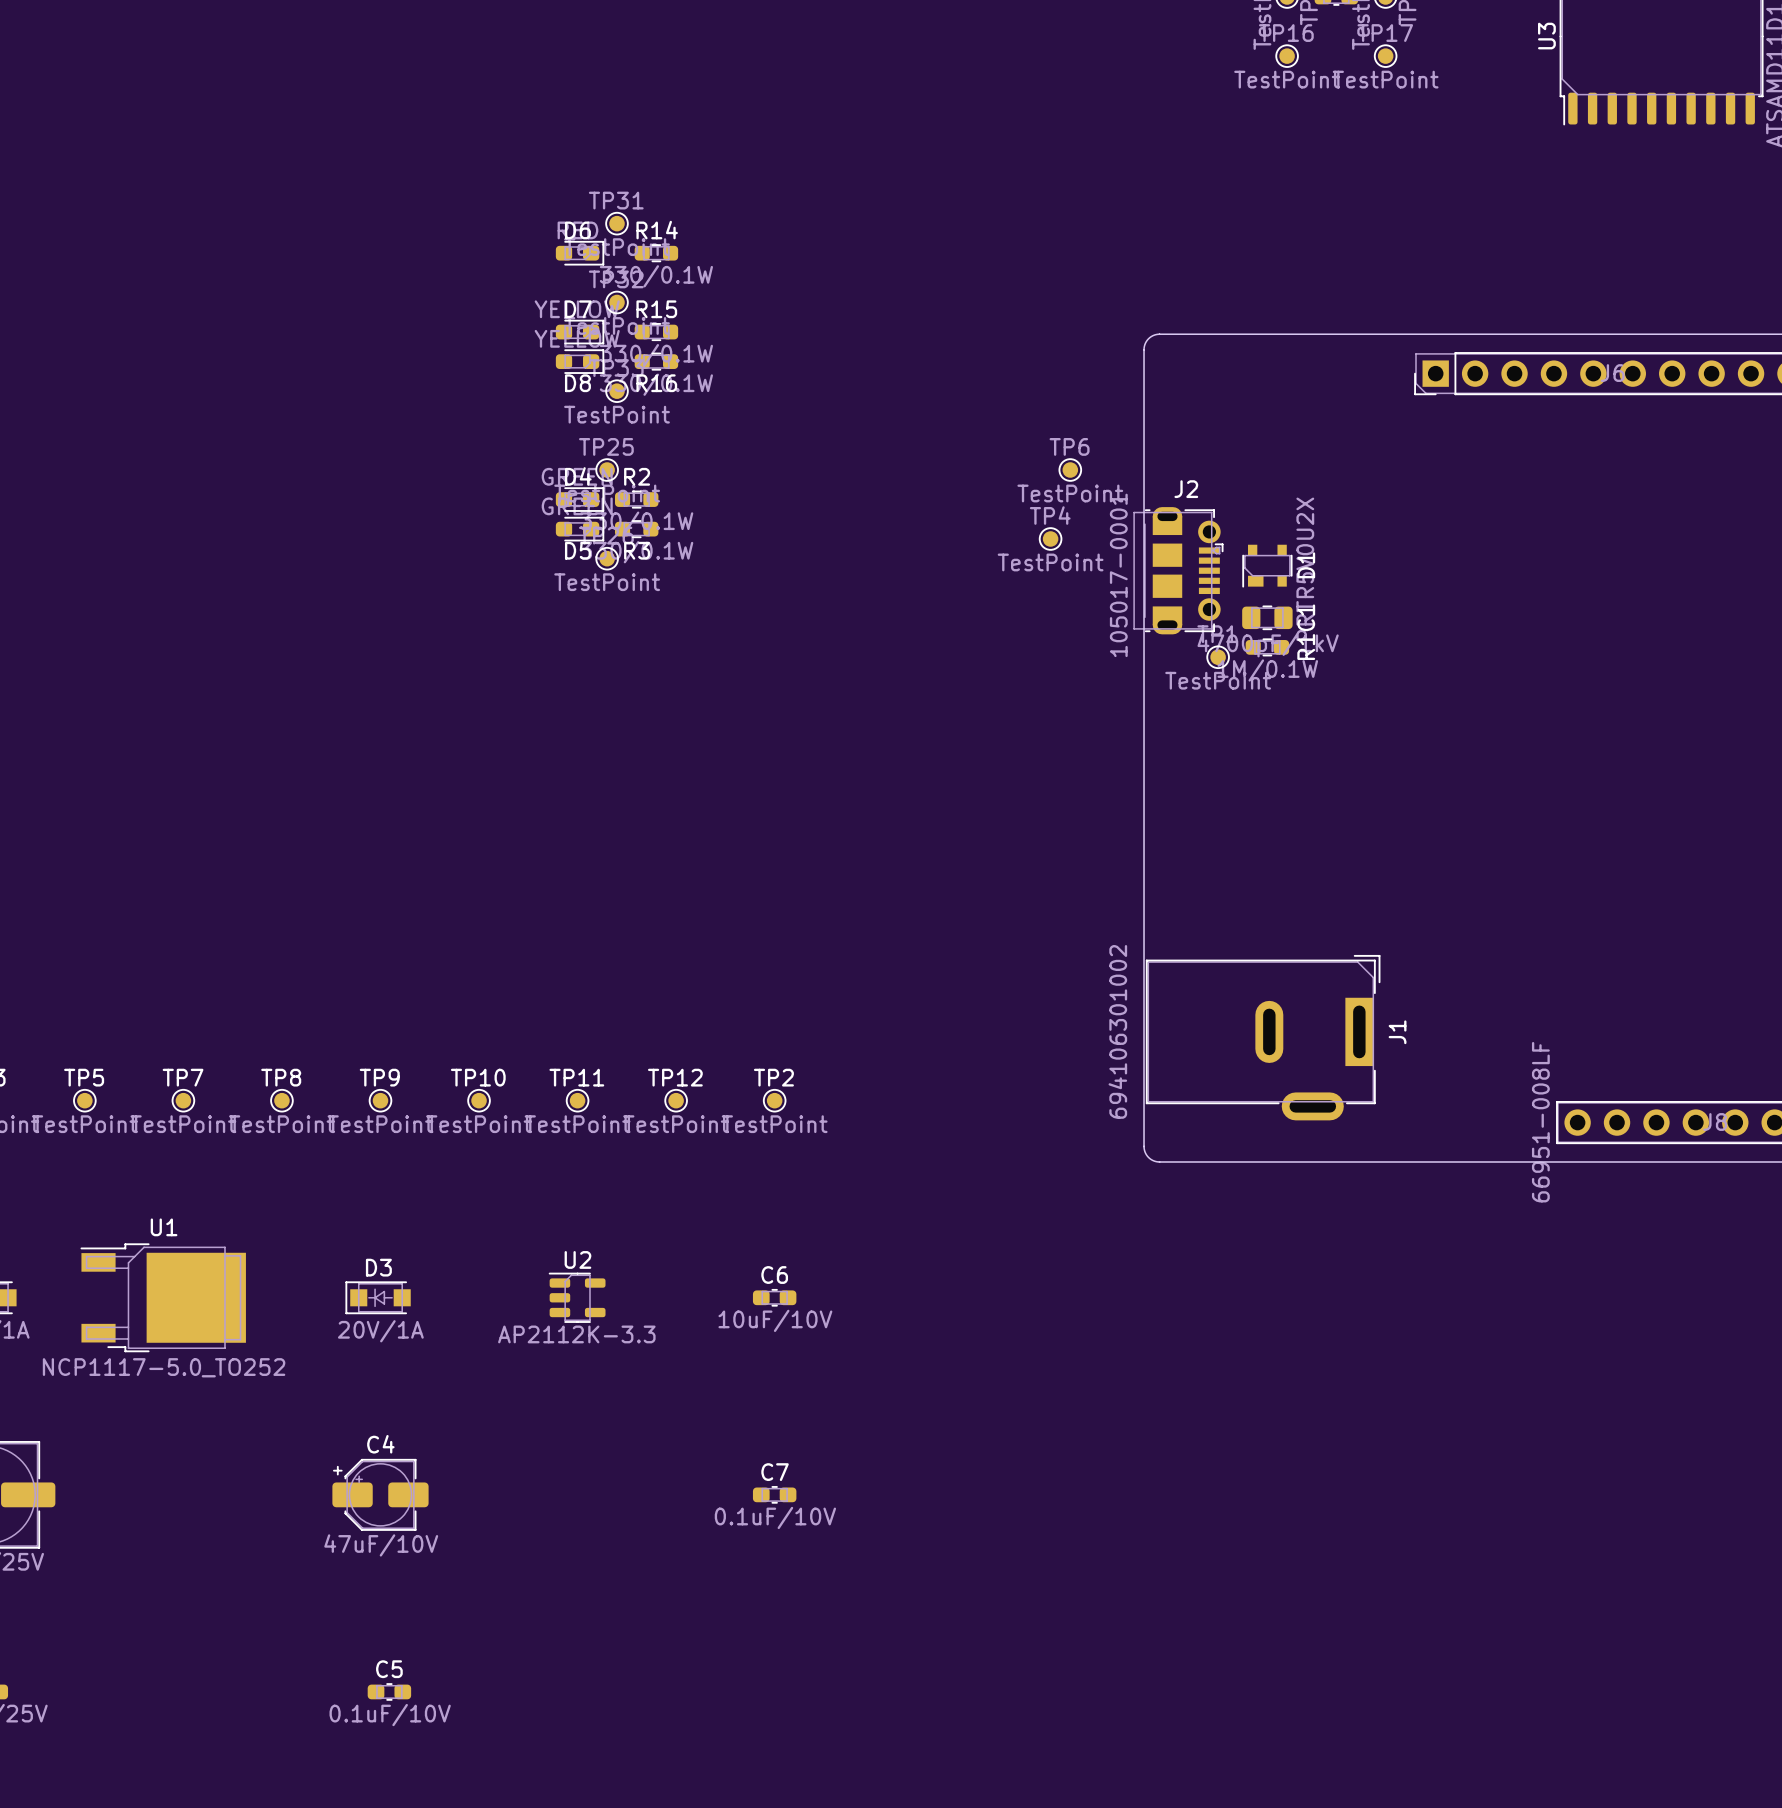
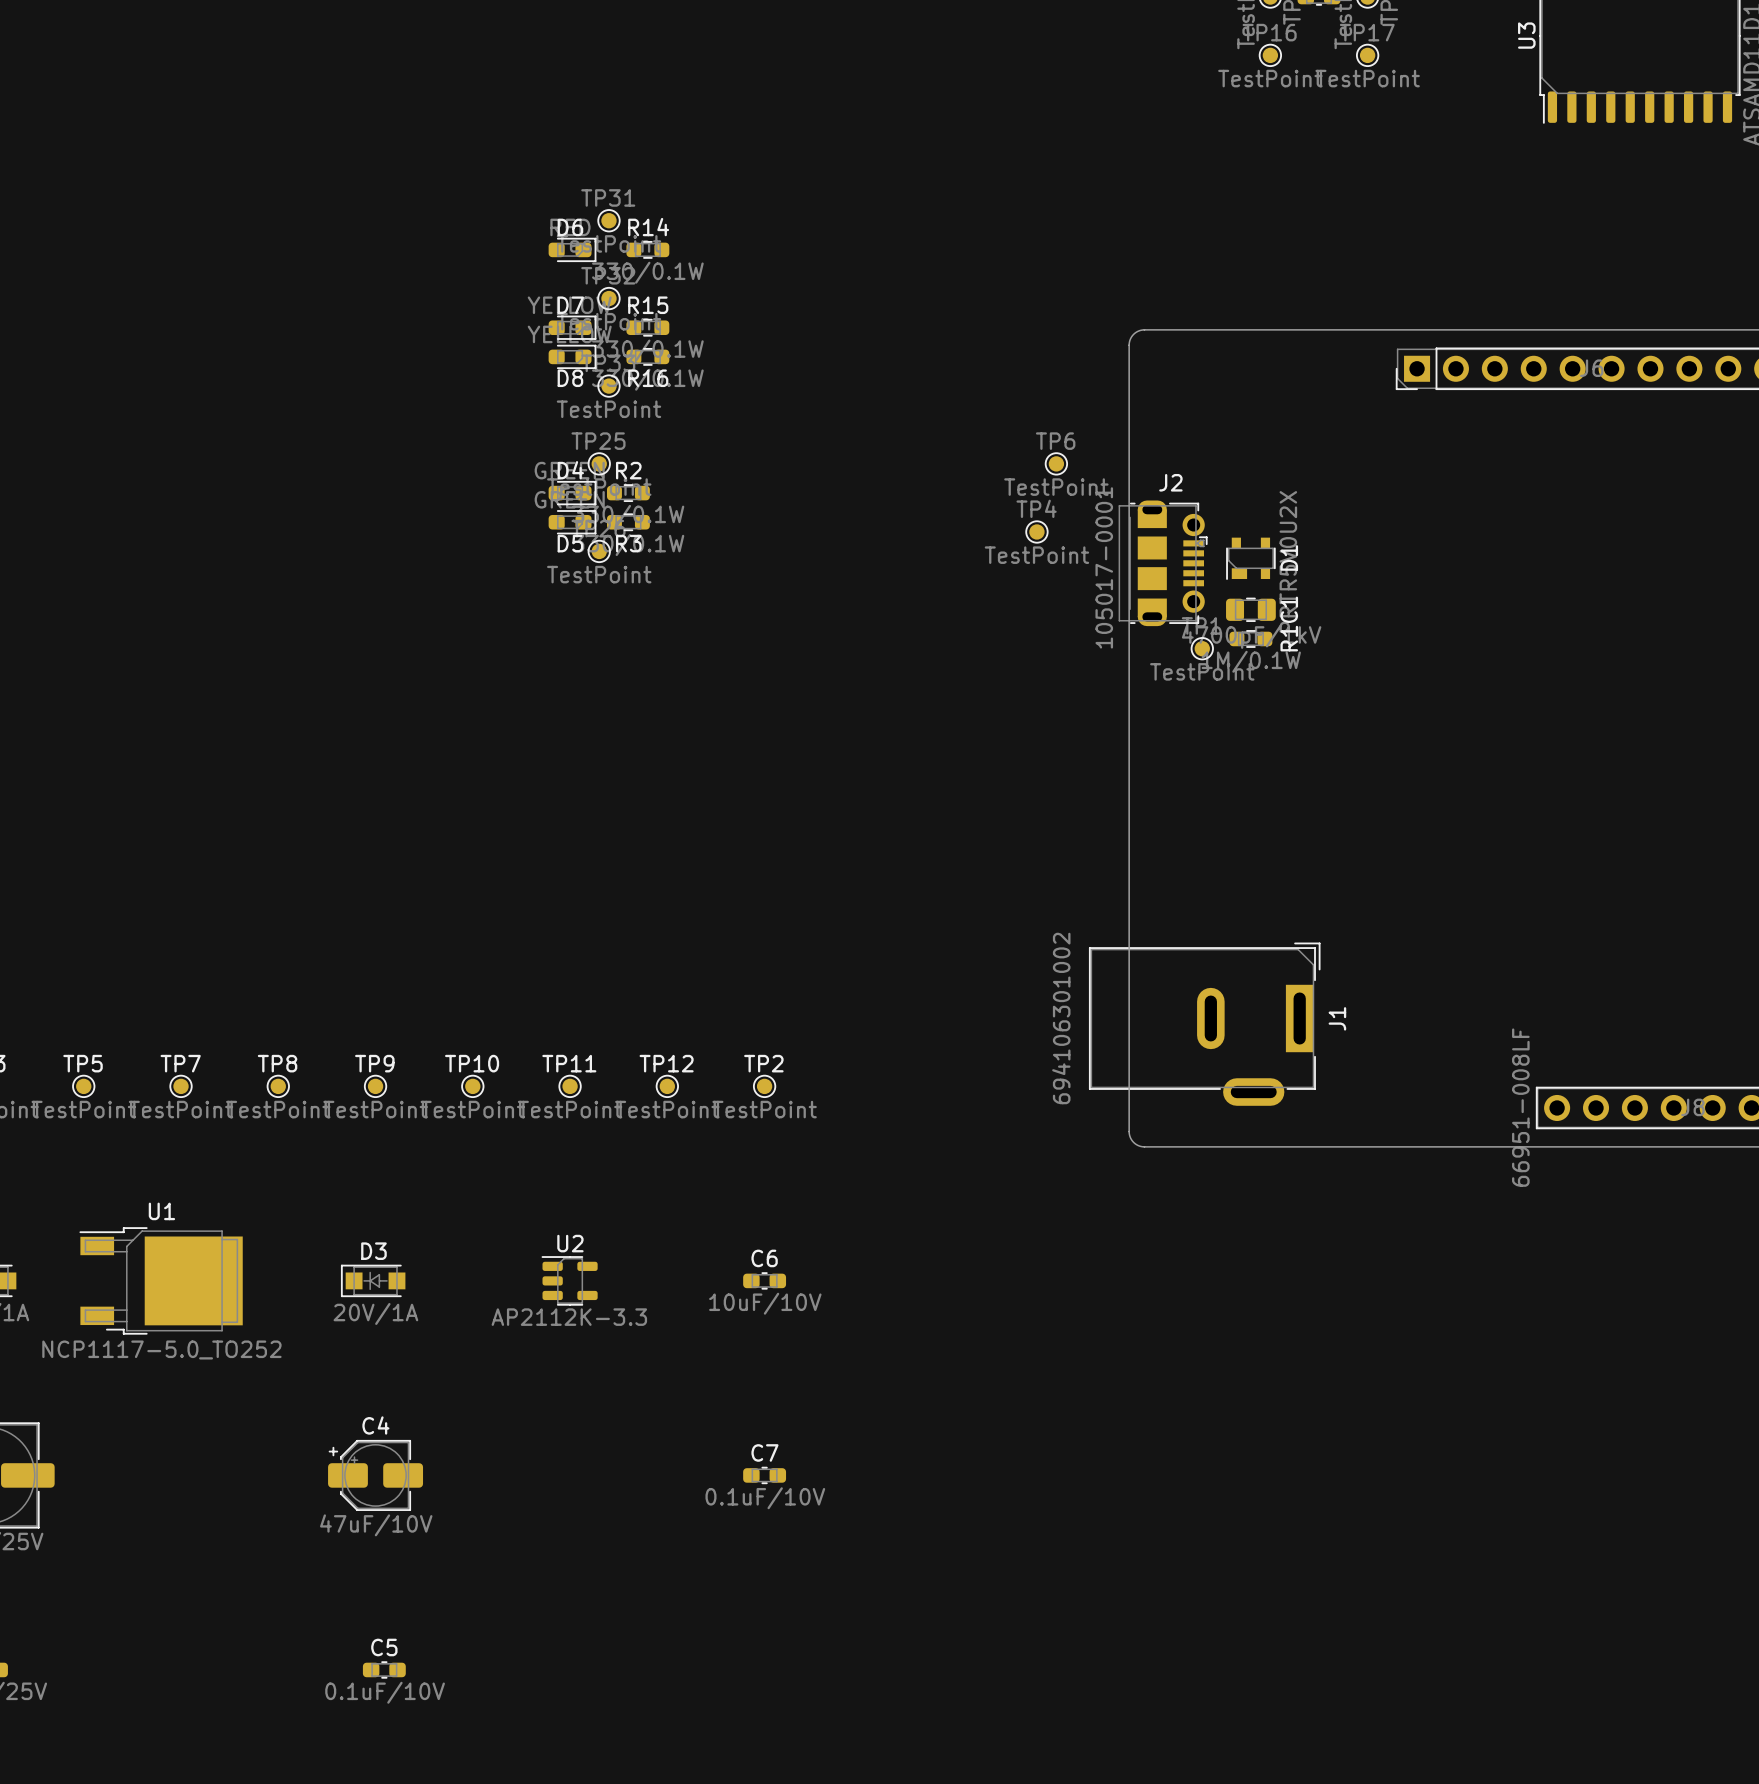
J1 position: (1263, 1037) -> (1204, 1024)

